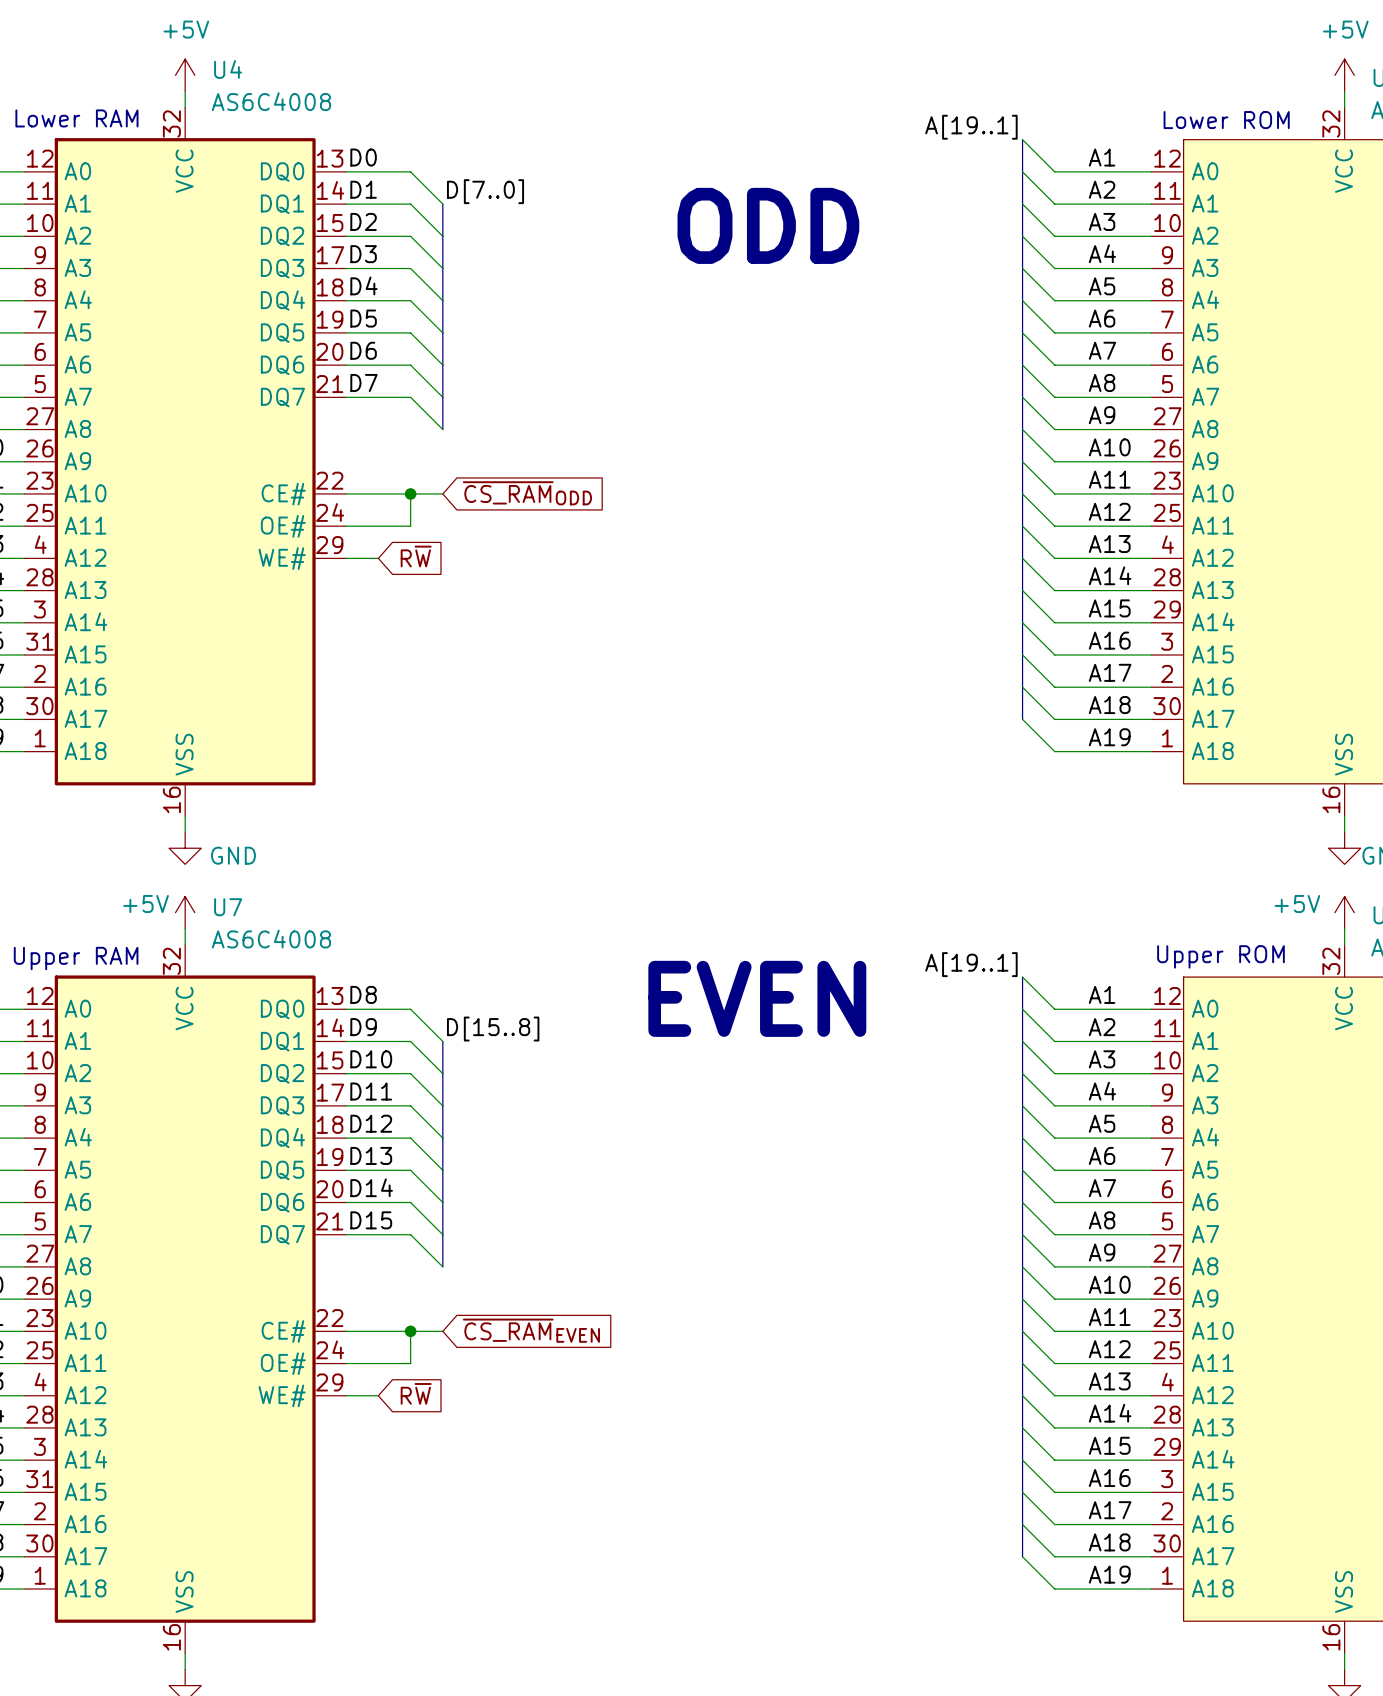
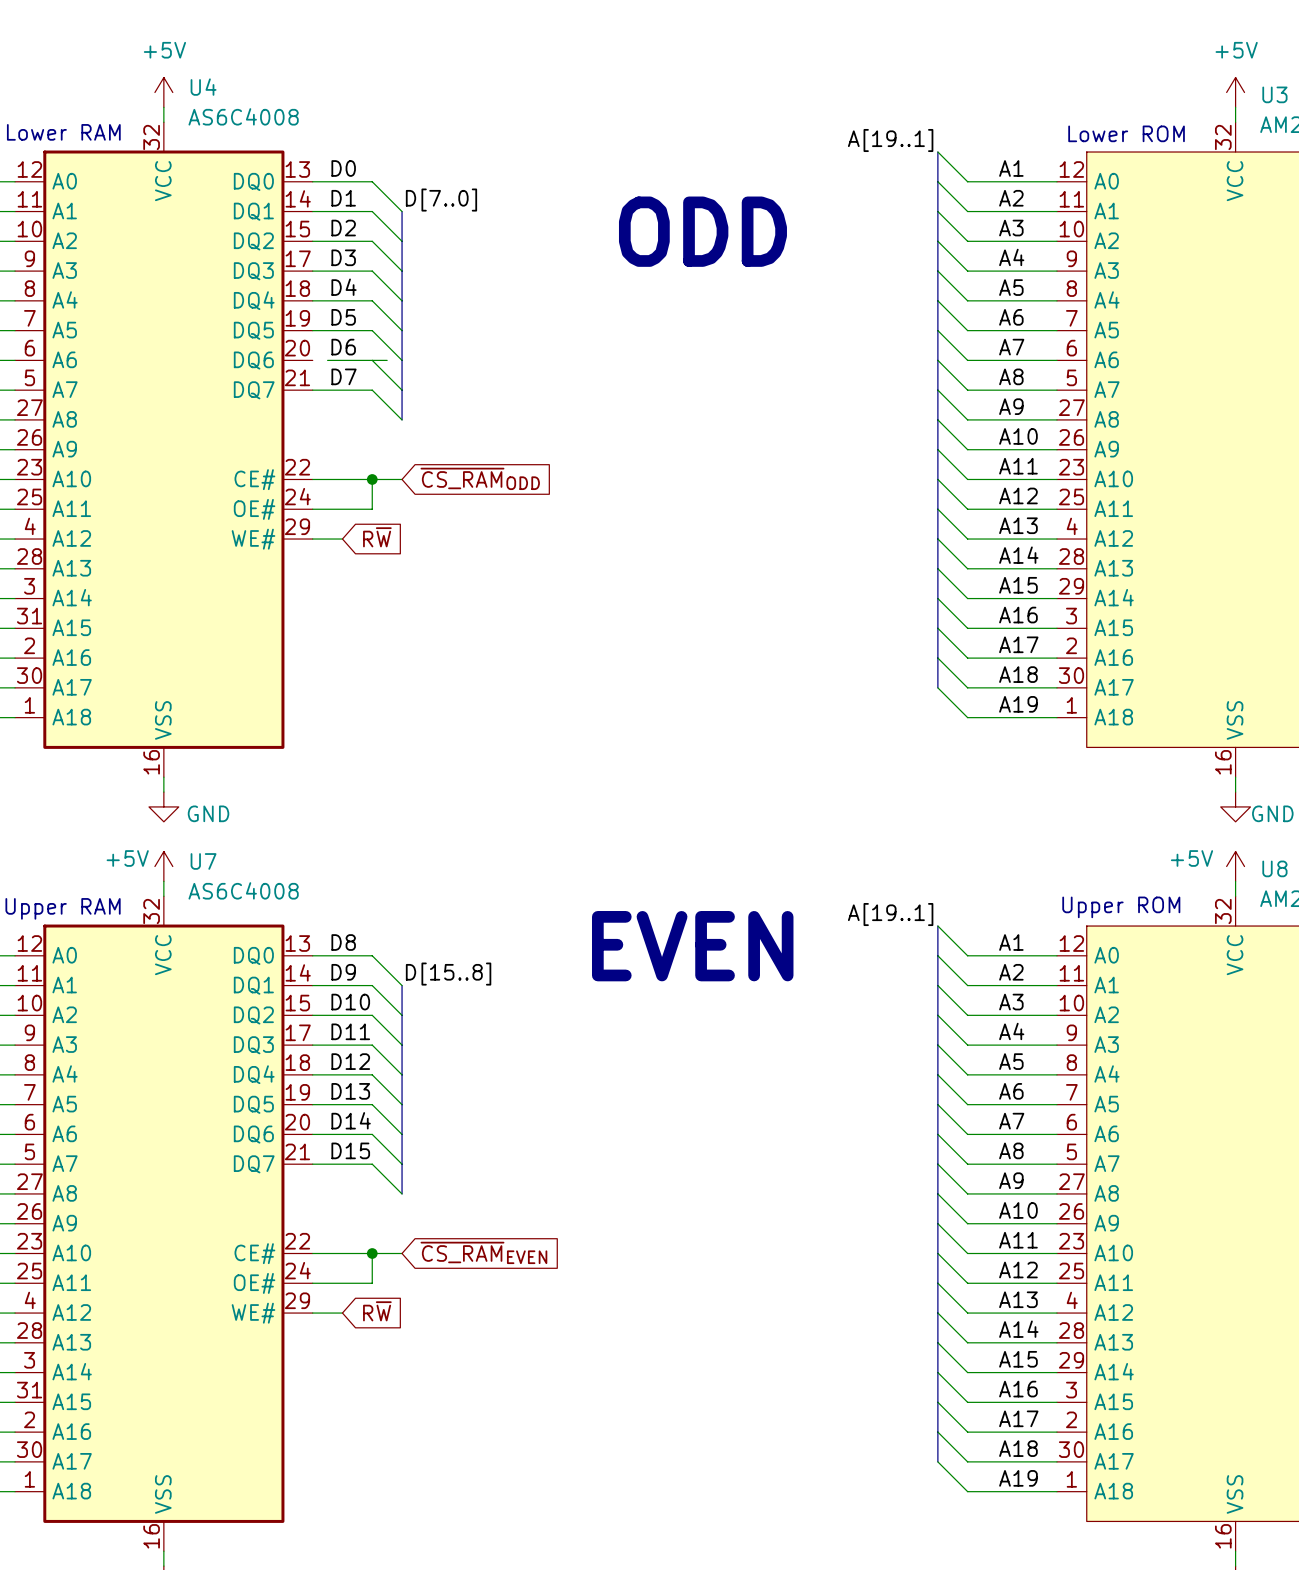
label position: D0 (363, 157) -> D0 (343, 168)
label position: D1 (363, 189) -> D1 (343, 198)
label position: D2 (363, 221) -> D2 (343, 228)
label position: D3 (363, 254) -> D3 (343, 257)
label position: D4 (363, 285) -> D4 (344, 287)
label position: D5 (363, 318) -> D5 (343, 317)
label position: D6 (363, 350) -> D6 (343, 347)
wire: (346, 365) (362, 365) -> (372, 360) (387, 360)
label position: D7 (363, 382) -> D7 (344, 376)
label position: D8 (363, 994) -> D8 (343, 942)
label position: D9 (363, 1027) -> D9 (343, 972)
label position: D10 (371, 1059) -> D10 (350, 1002)
label position: D11 (371, 1091) -> D11 (350, 1031)
label position: D12 (371, 1123) -> D12 (350, 1061)
label position: D13 (371, 1155) -> D13 (350, 1091)
label position: D14 (371, 1187) -> D14 (351, 1120)
label position: D15 (371, 1220) -> D15 (350, 1150)

